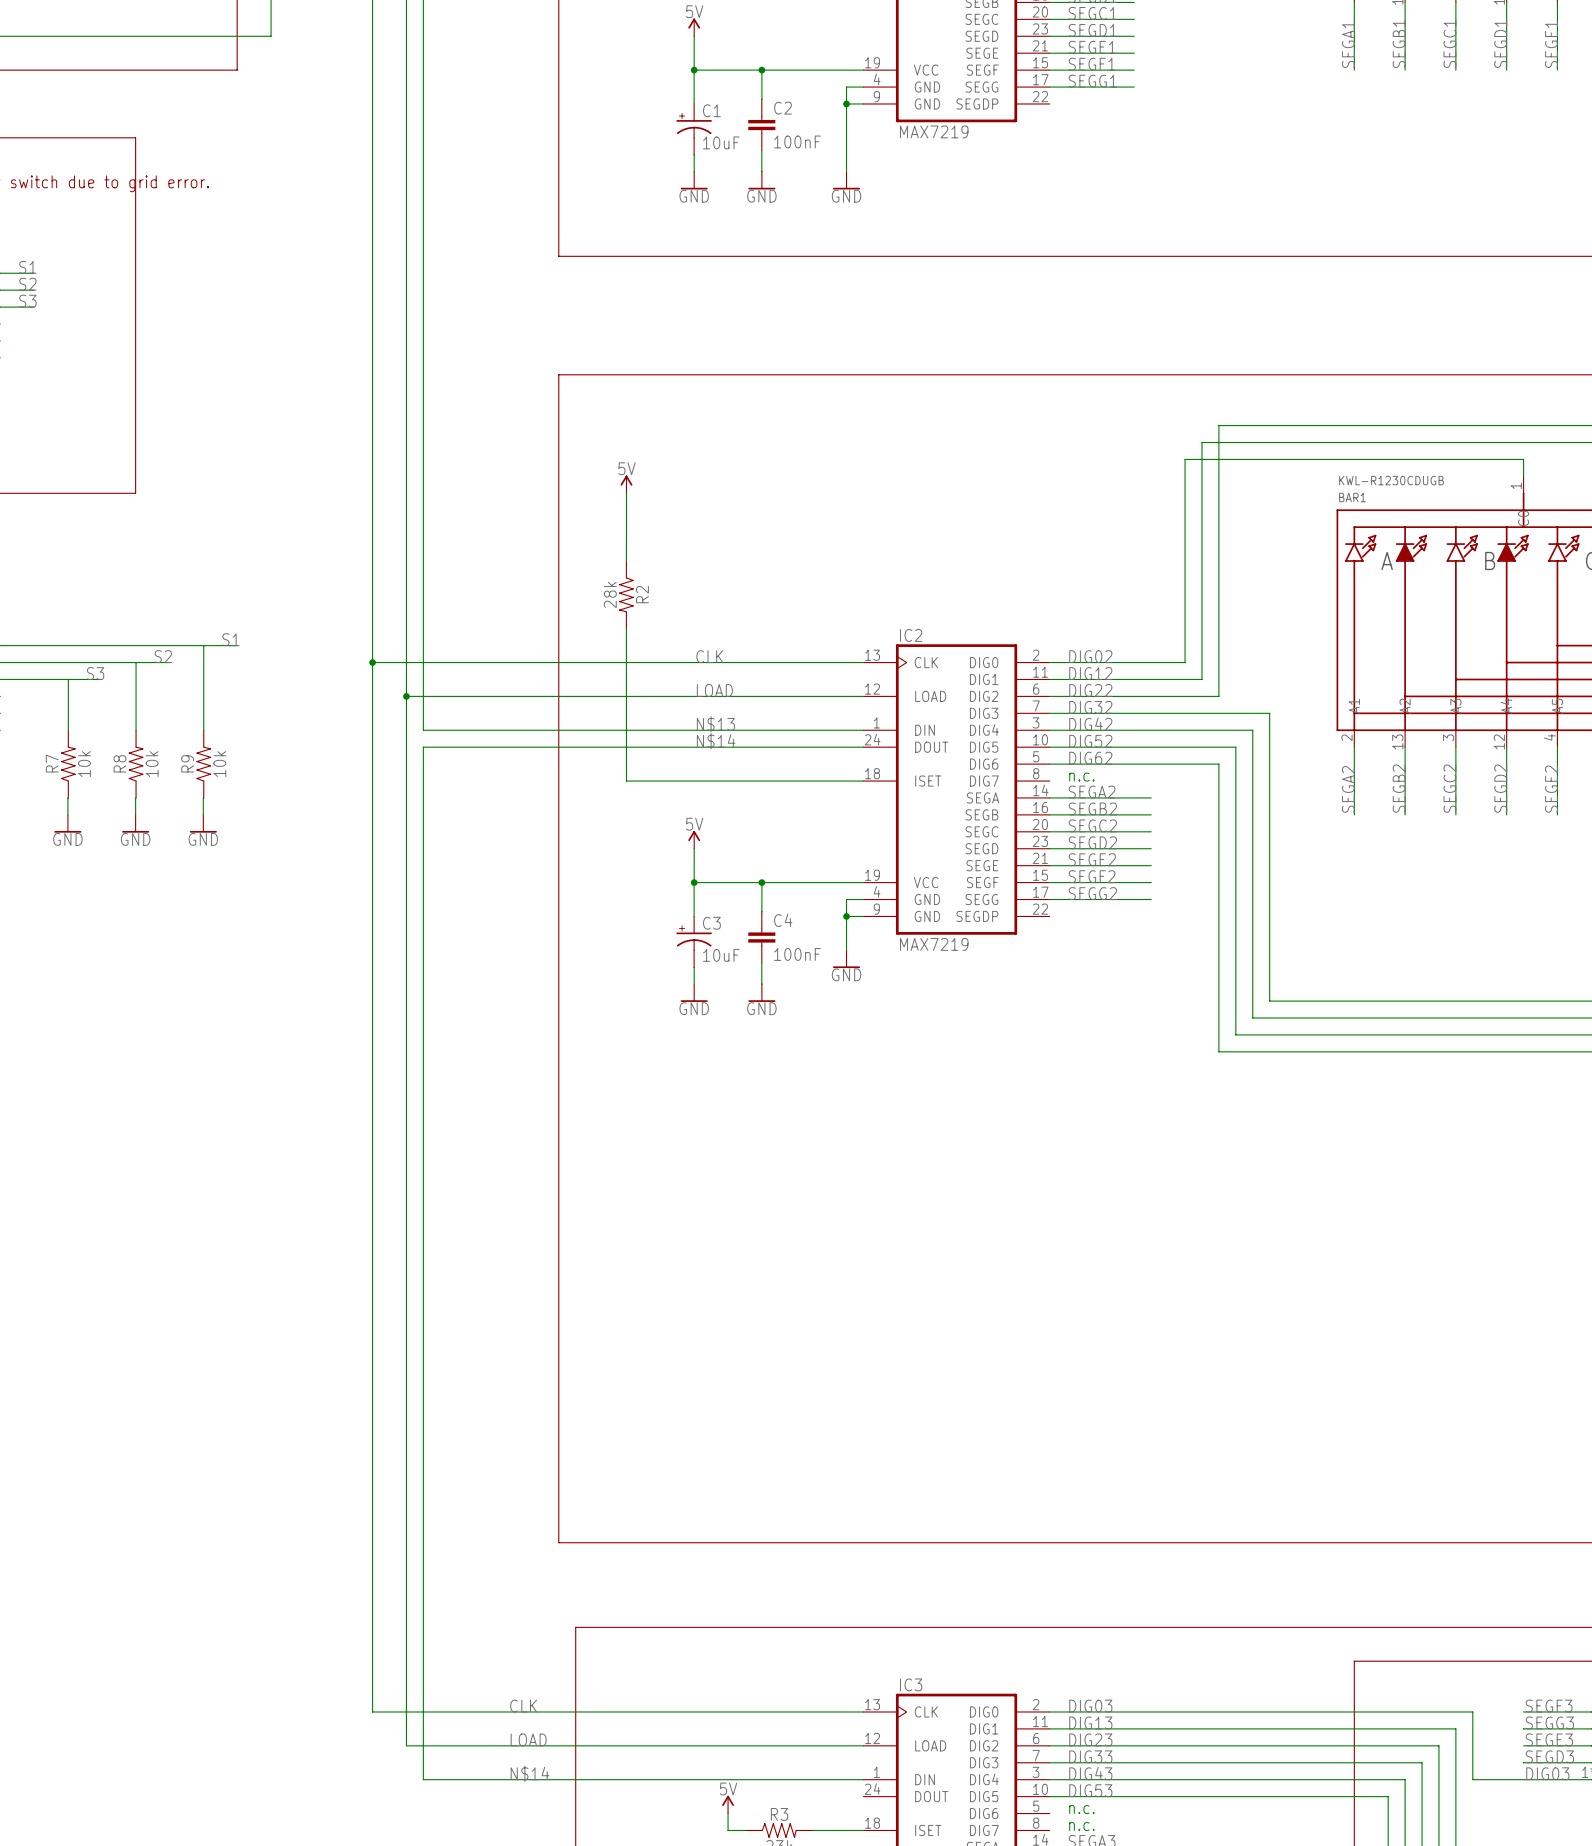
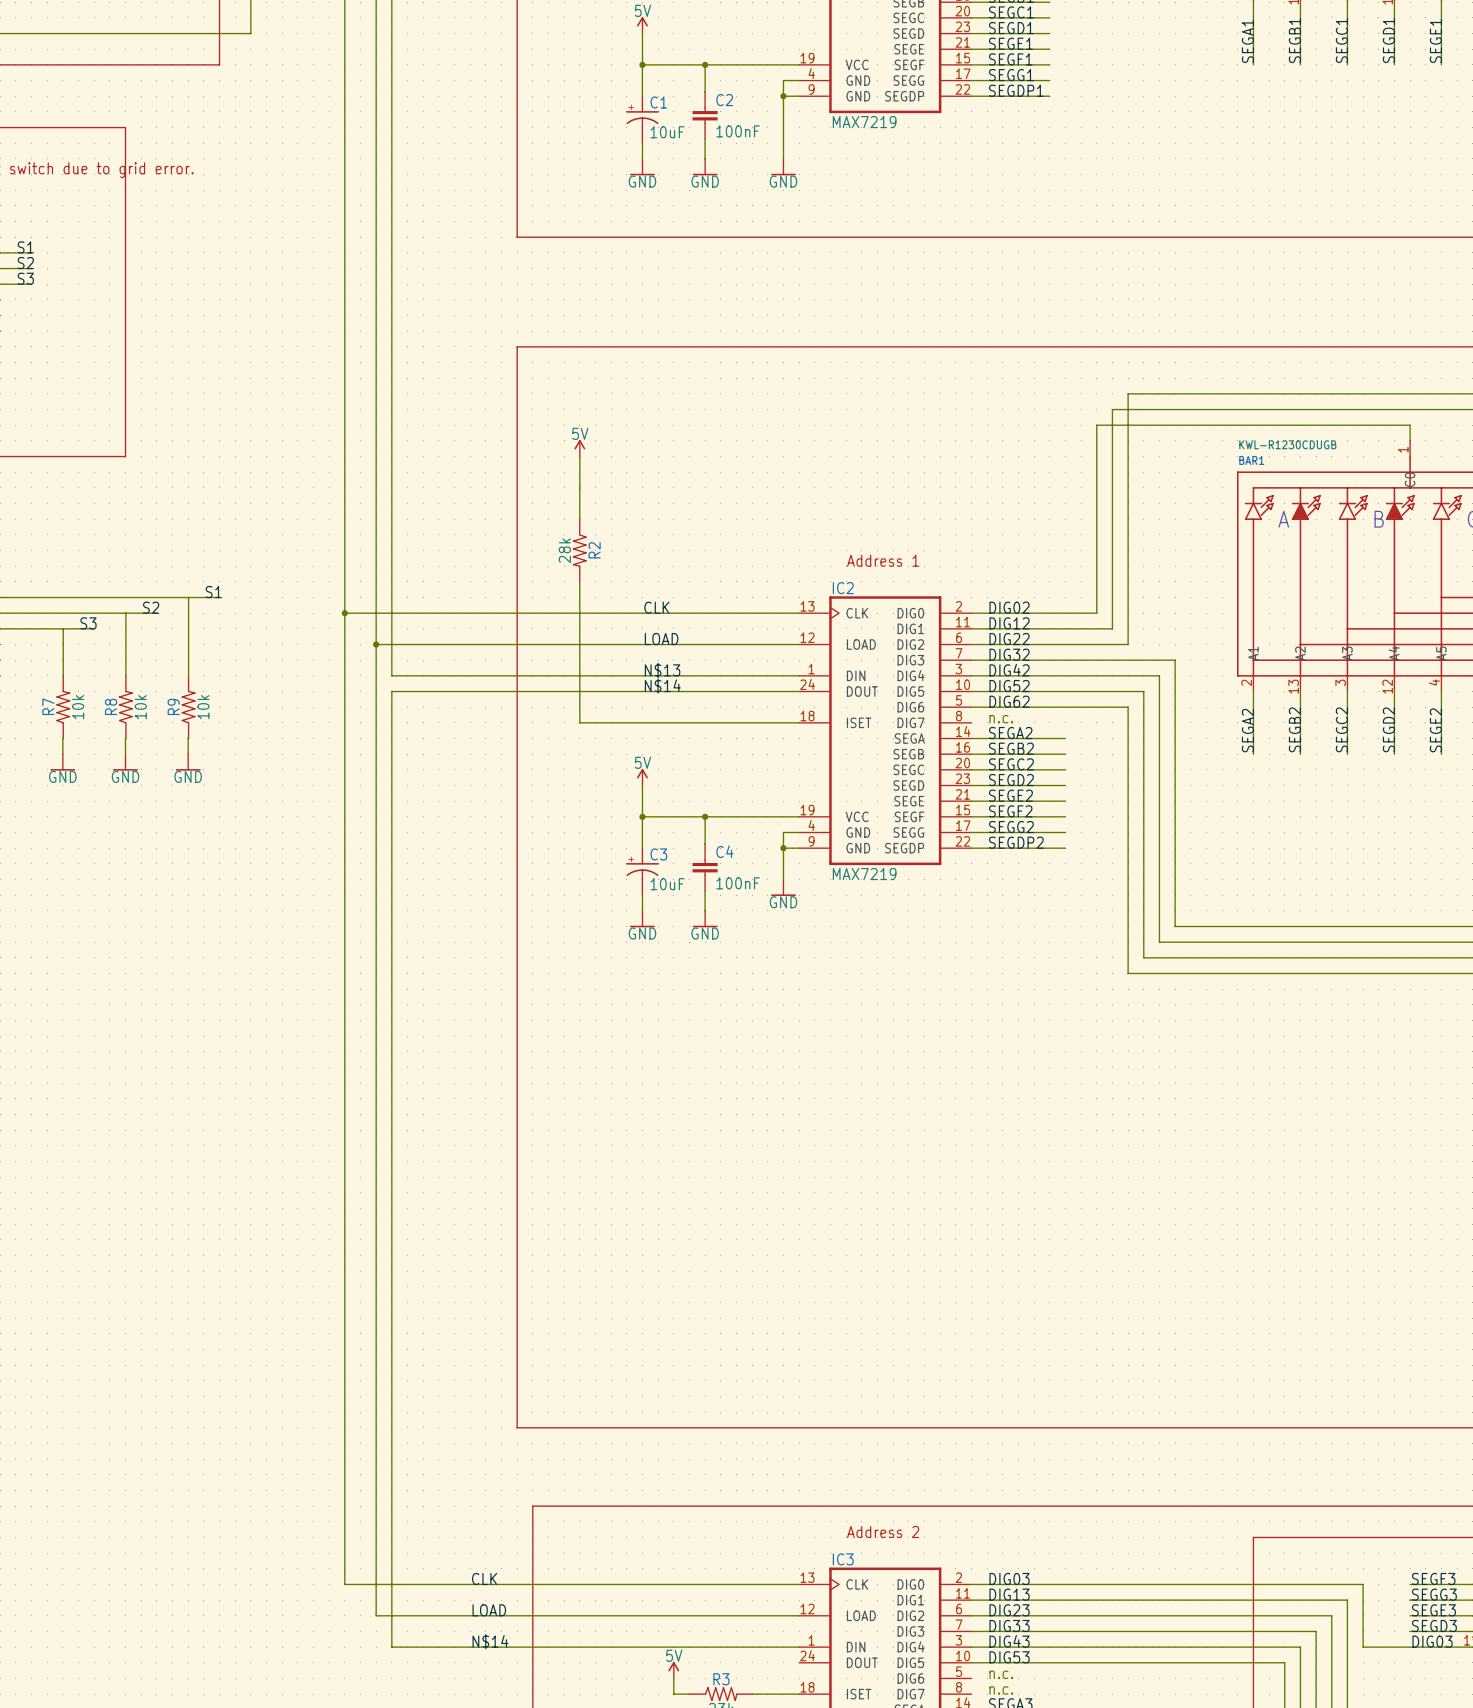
label: none -> SEGDP1 (1016, 90)
wire: none -> (971, 96) (1049, 96)
text: none -> Address 1 (883, 560)
label: none -> SEGDP2 (1016, 842)
wire: none -> (971, 848) (1065, 848)
text: none -> Address 2 (883, 1531)

